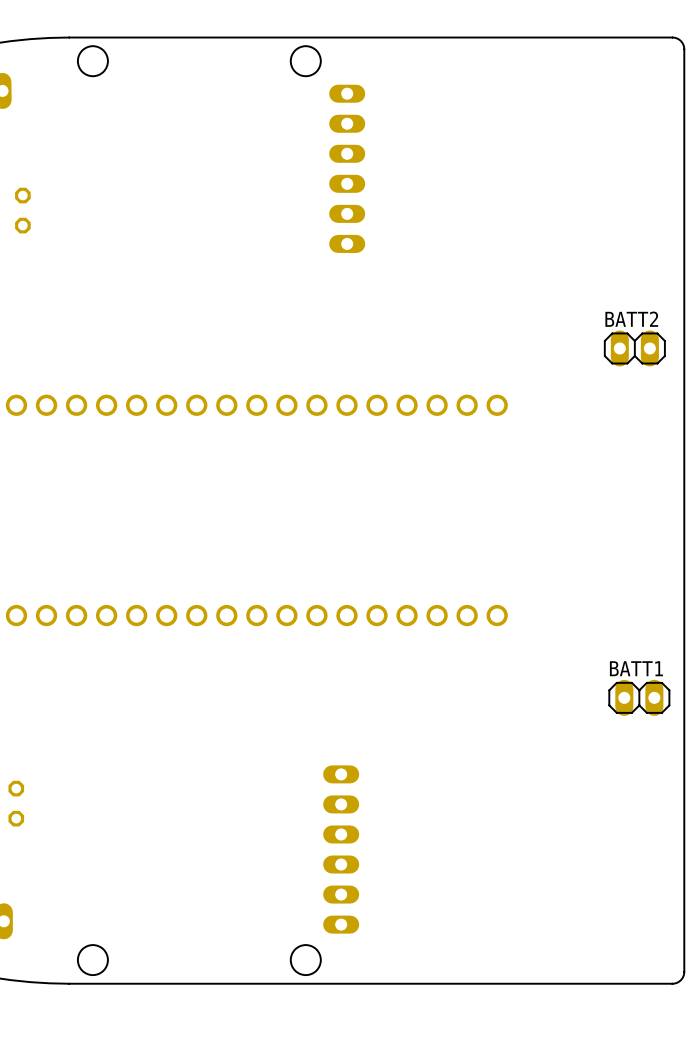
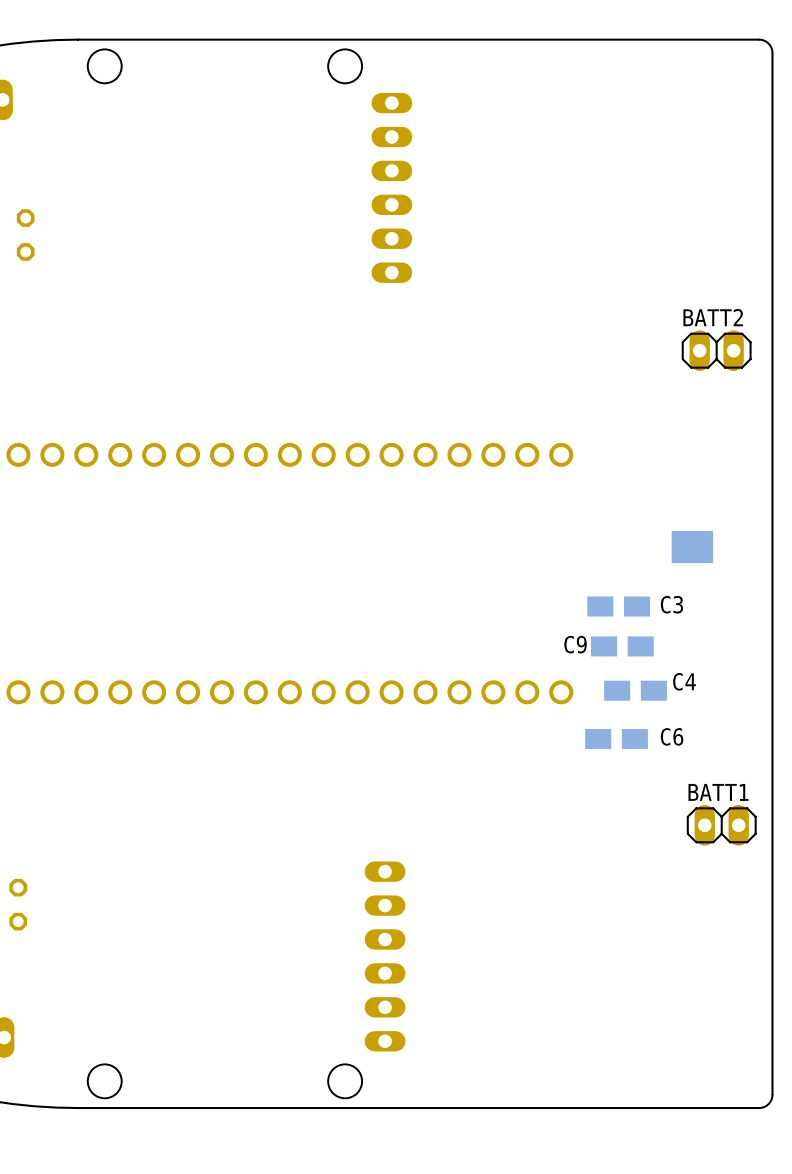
BATT2 position: (634, 348) -> (716, 350)
part: none -> (692, 547)
C3: none -> (618, 606)
C9: none -> (622, 646)
C4: none -> (635, 690)
C6: none -> (616, 739)
BATT1 position: (639, 697) -> (721, 825)

